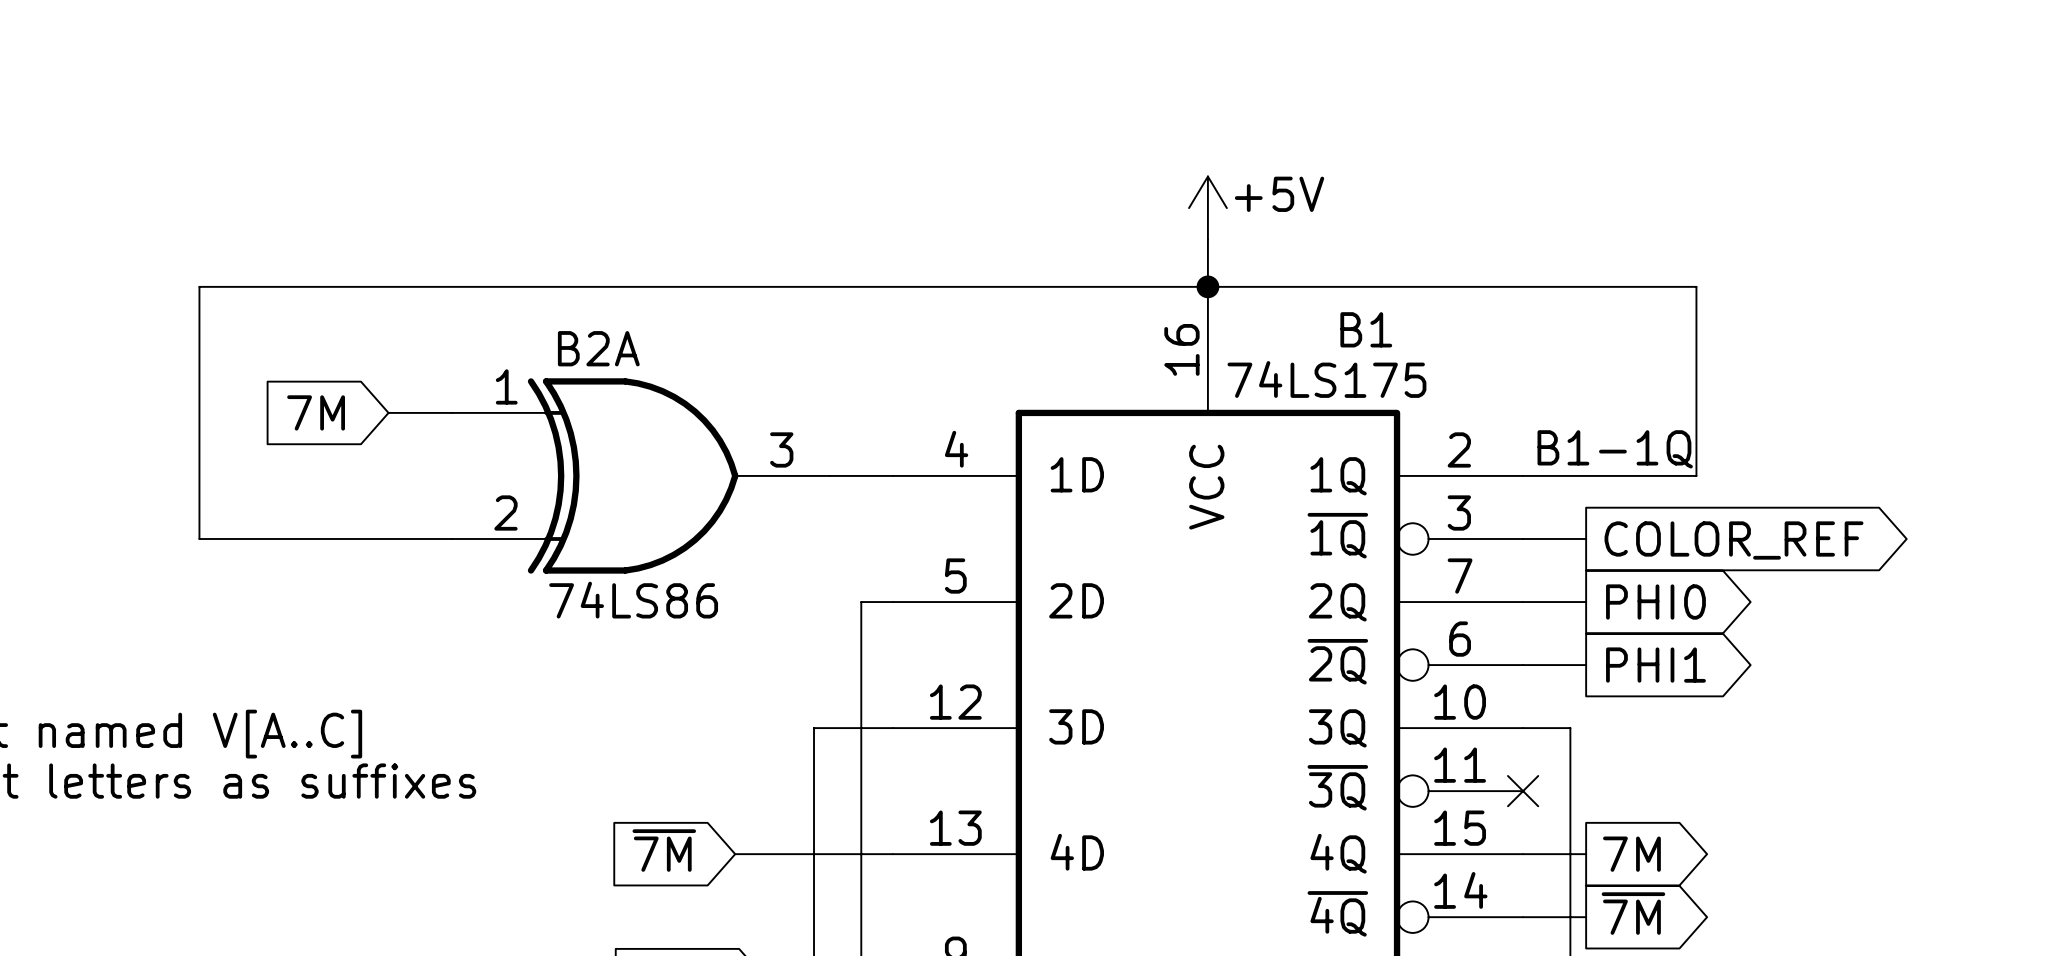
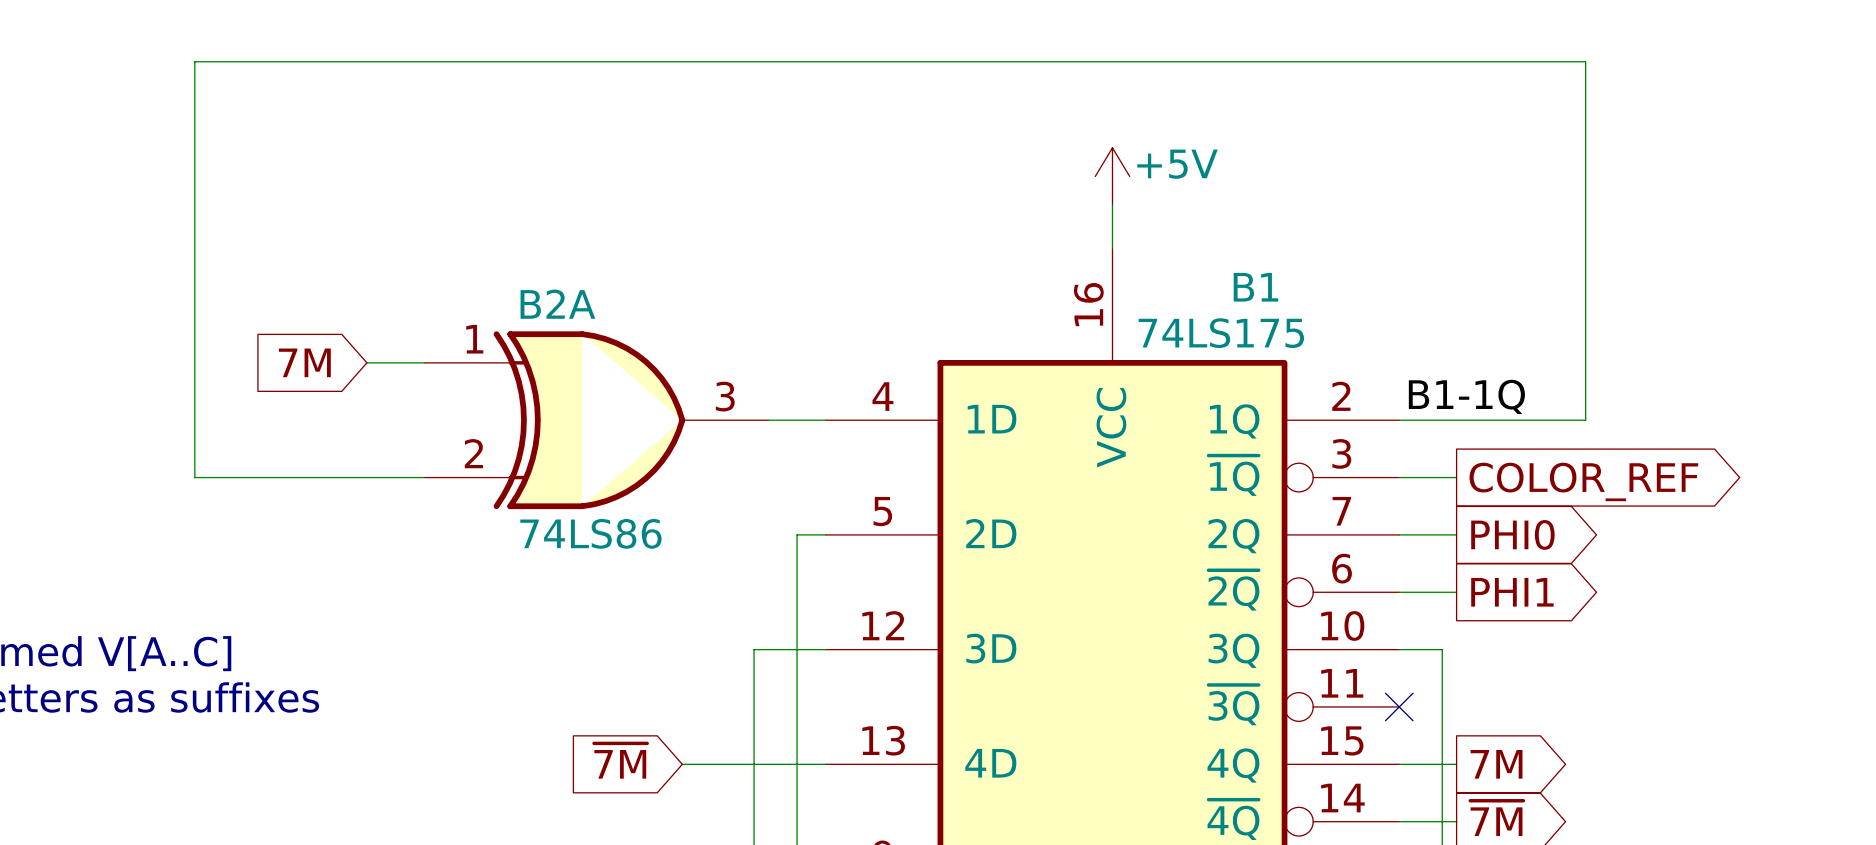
wire: (199, 286) (1696, 286) (1696, 475) -> (194, 248) (194, 61) (1585, 61) (1585, 420) (1556, 420)
junction: (1207, 286) -> none

